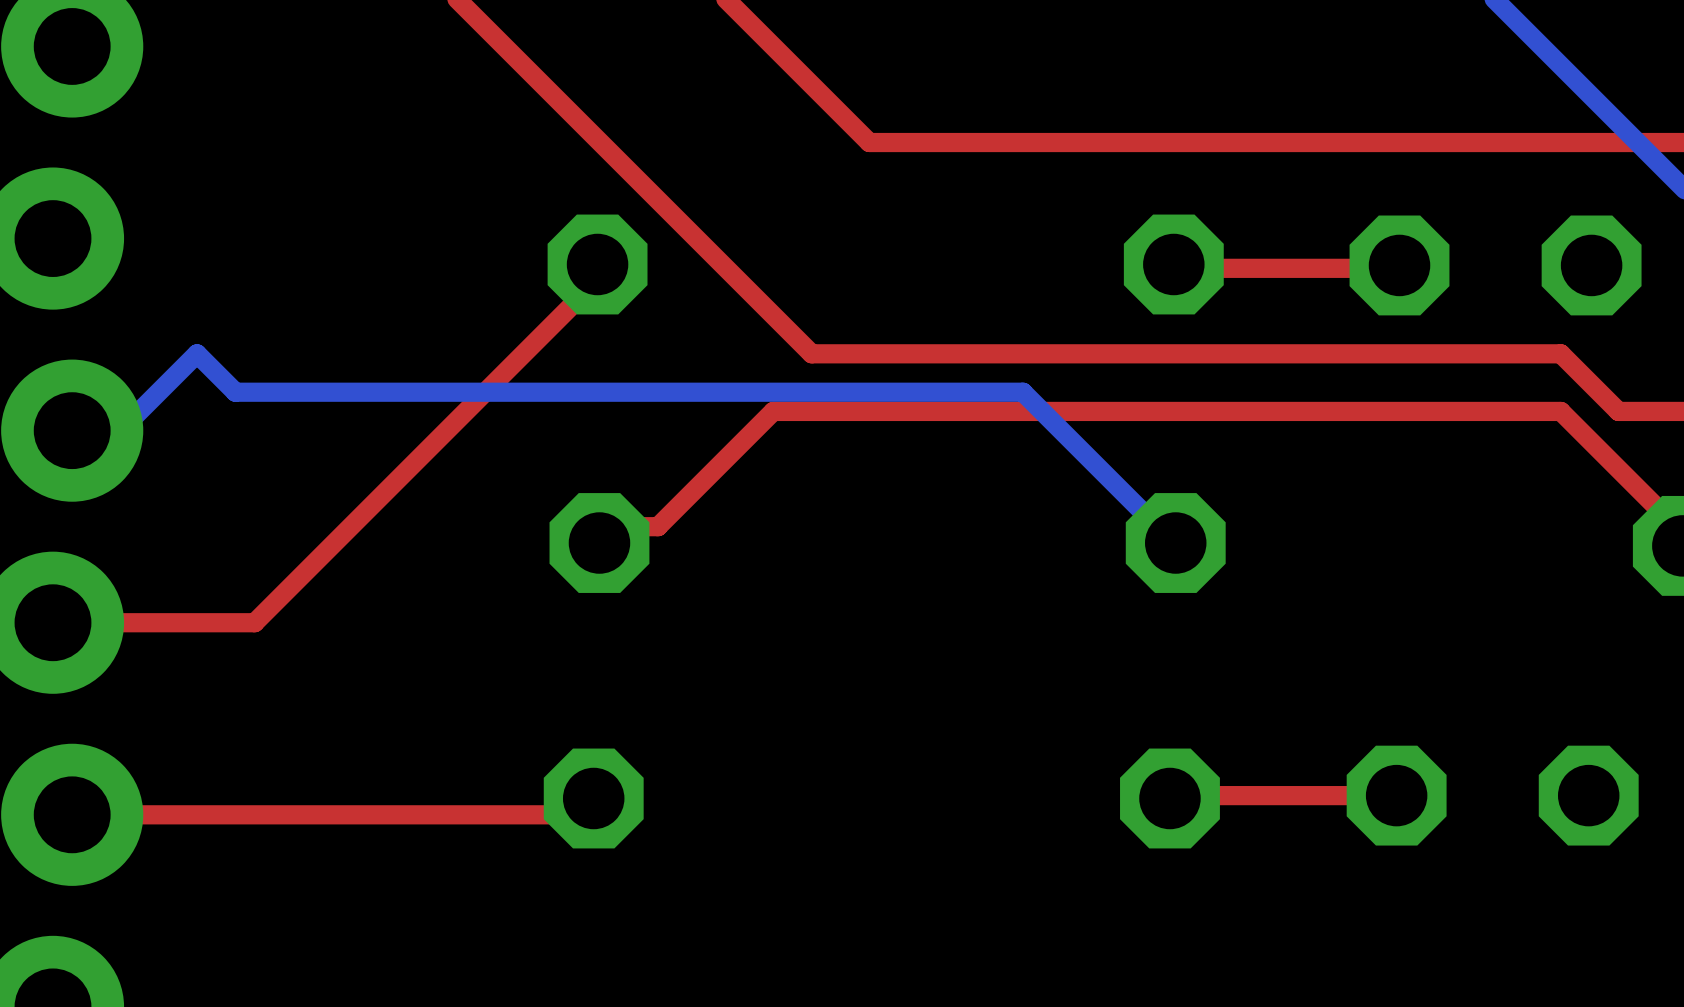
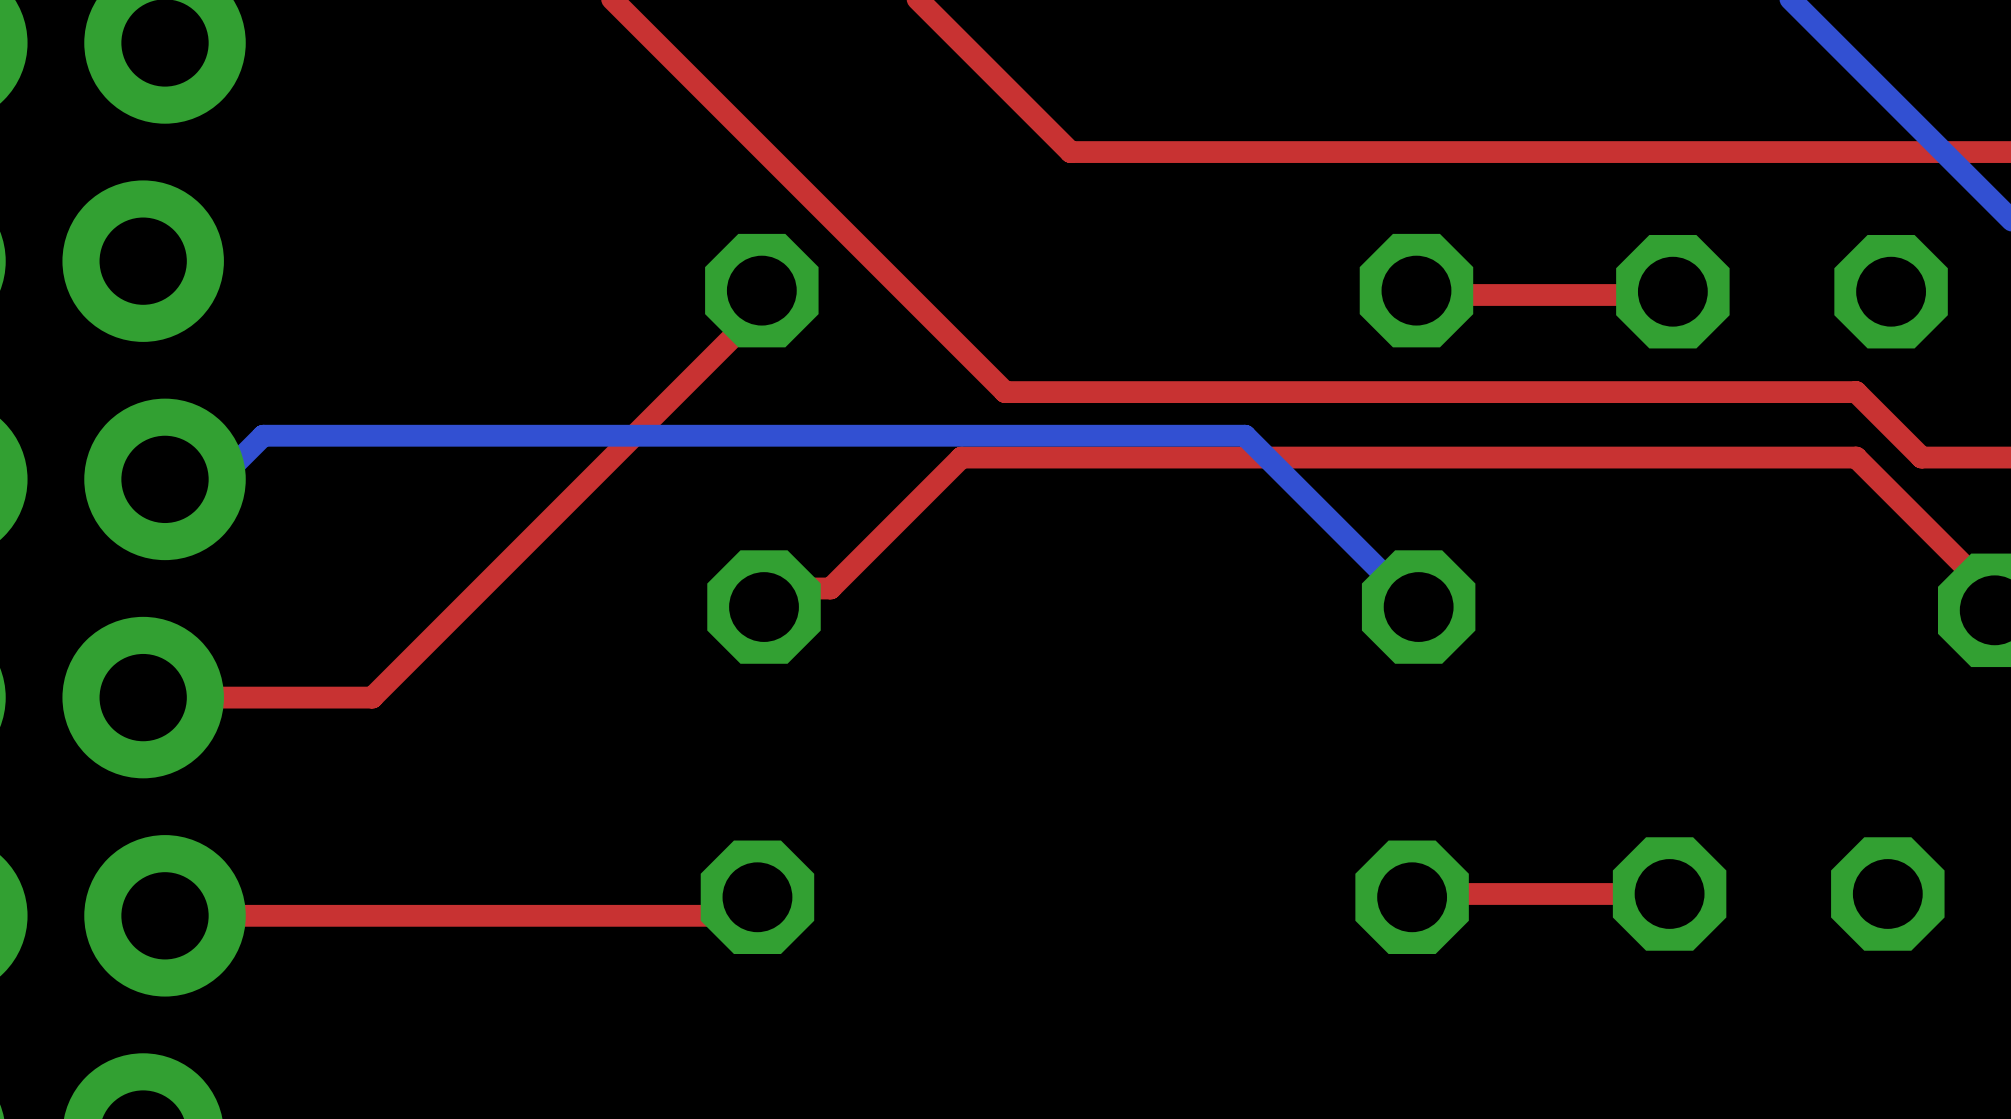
bottom track: (235, 392) (197, 353) (158, 392) -> (350, 435) (263, 435)

